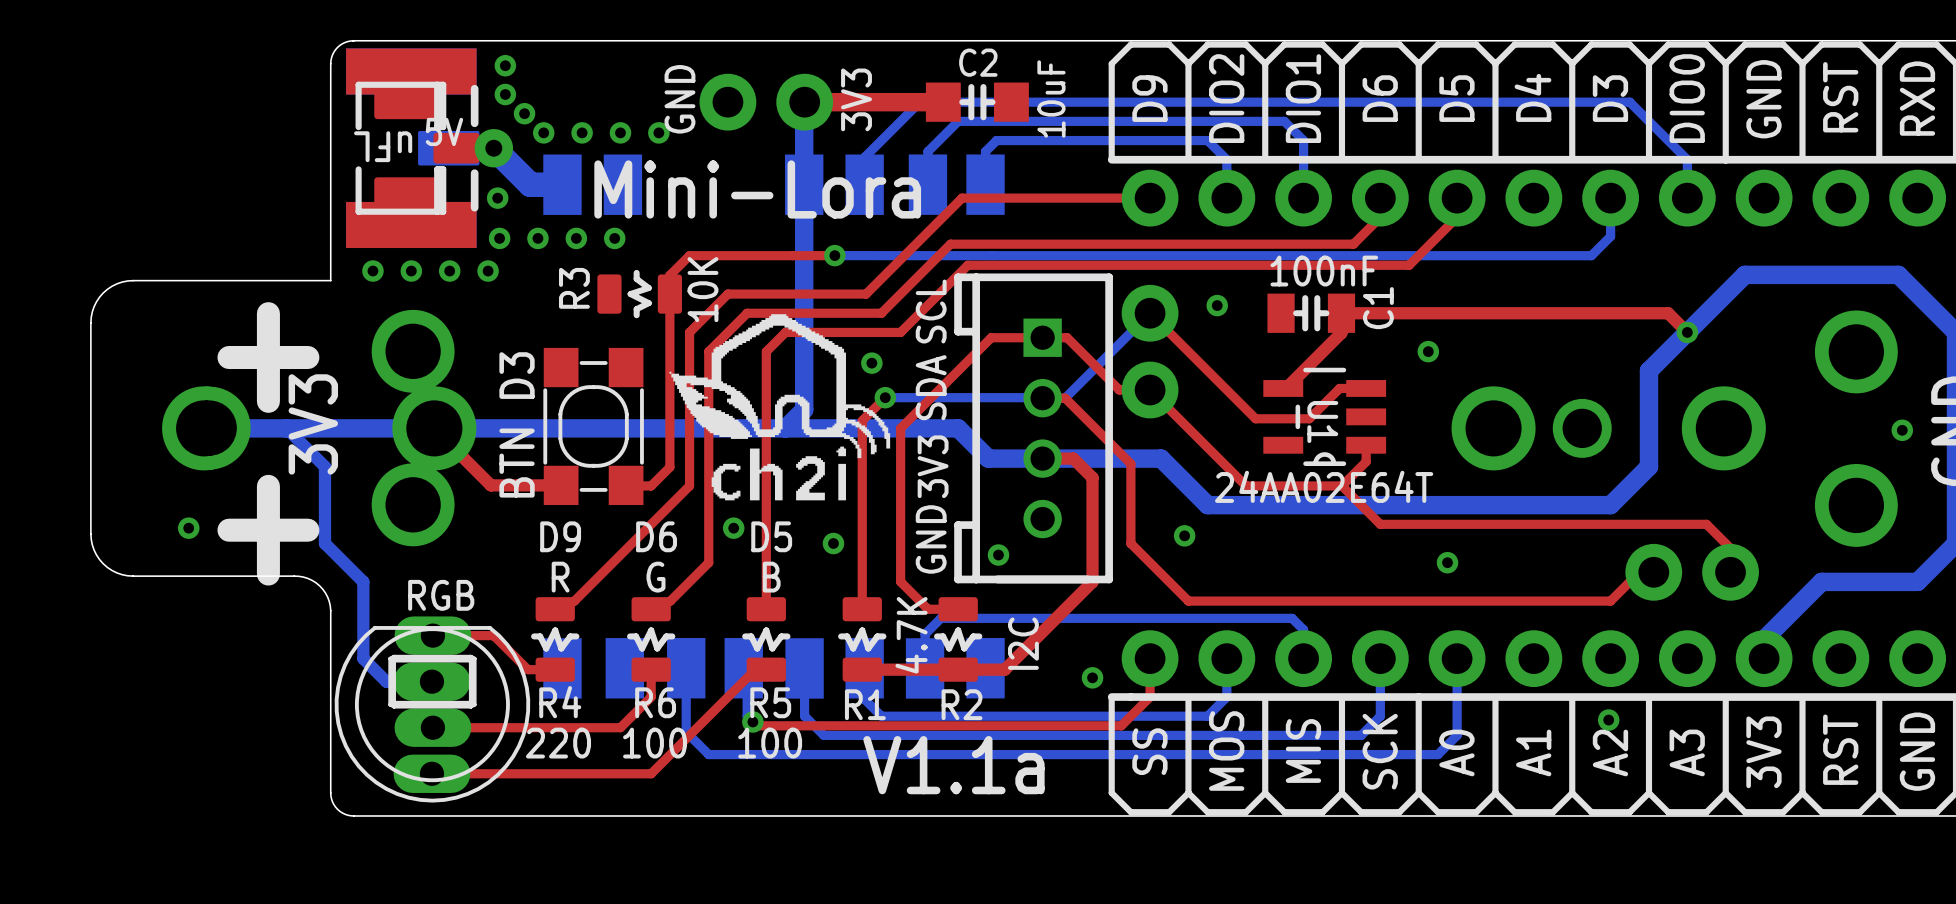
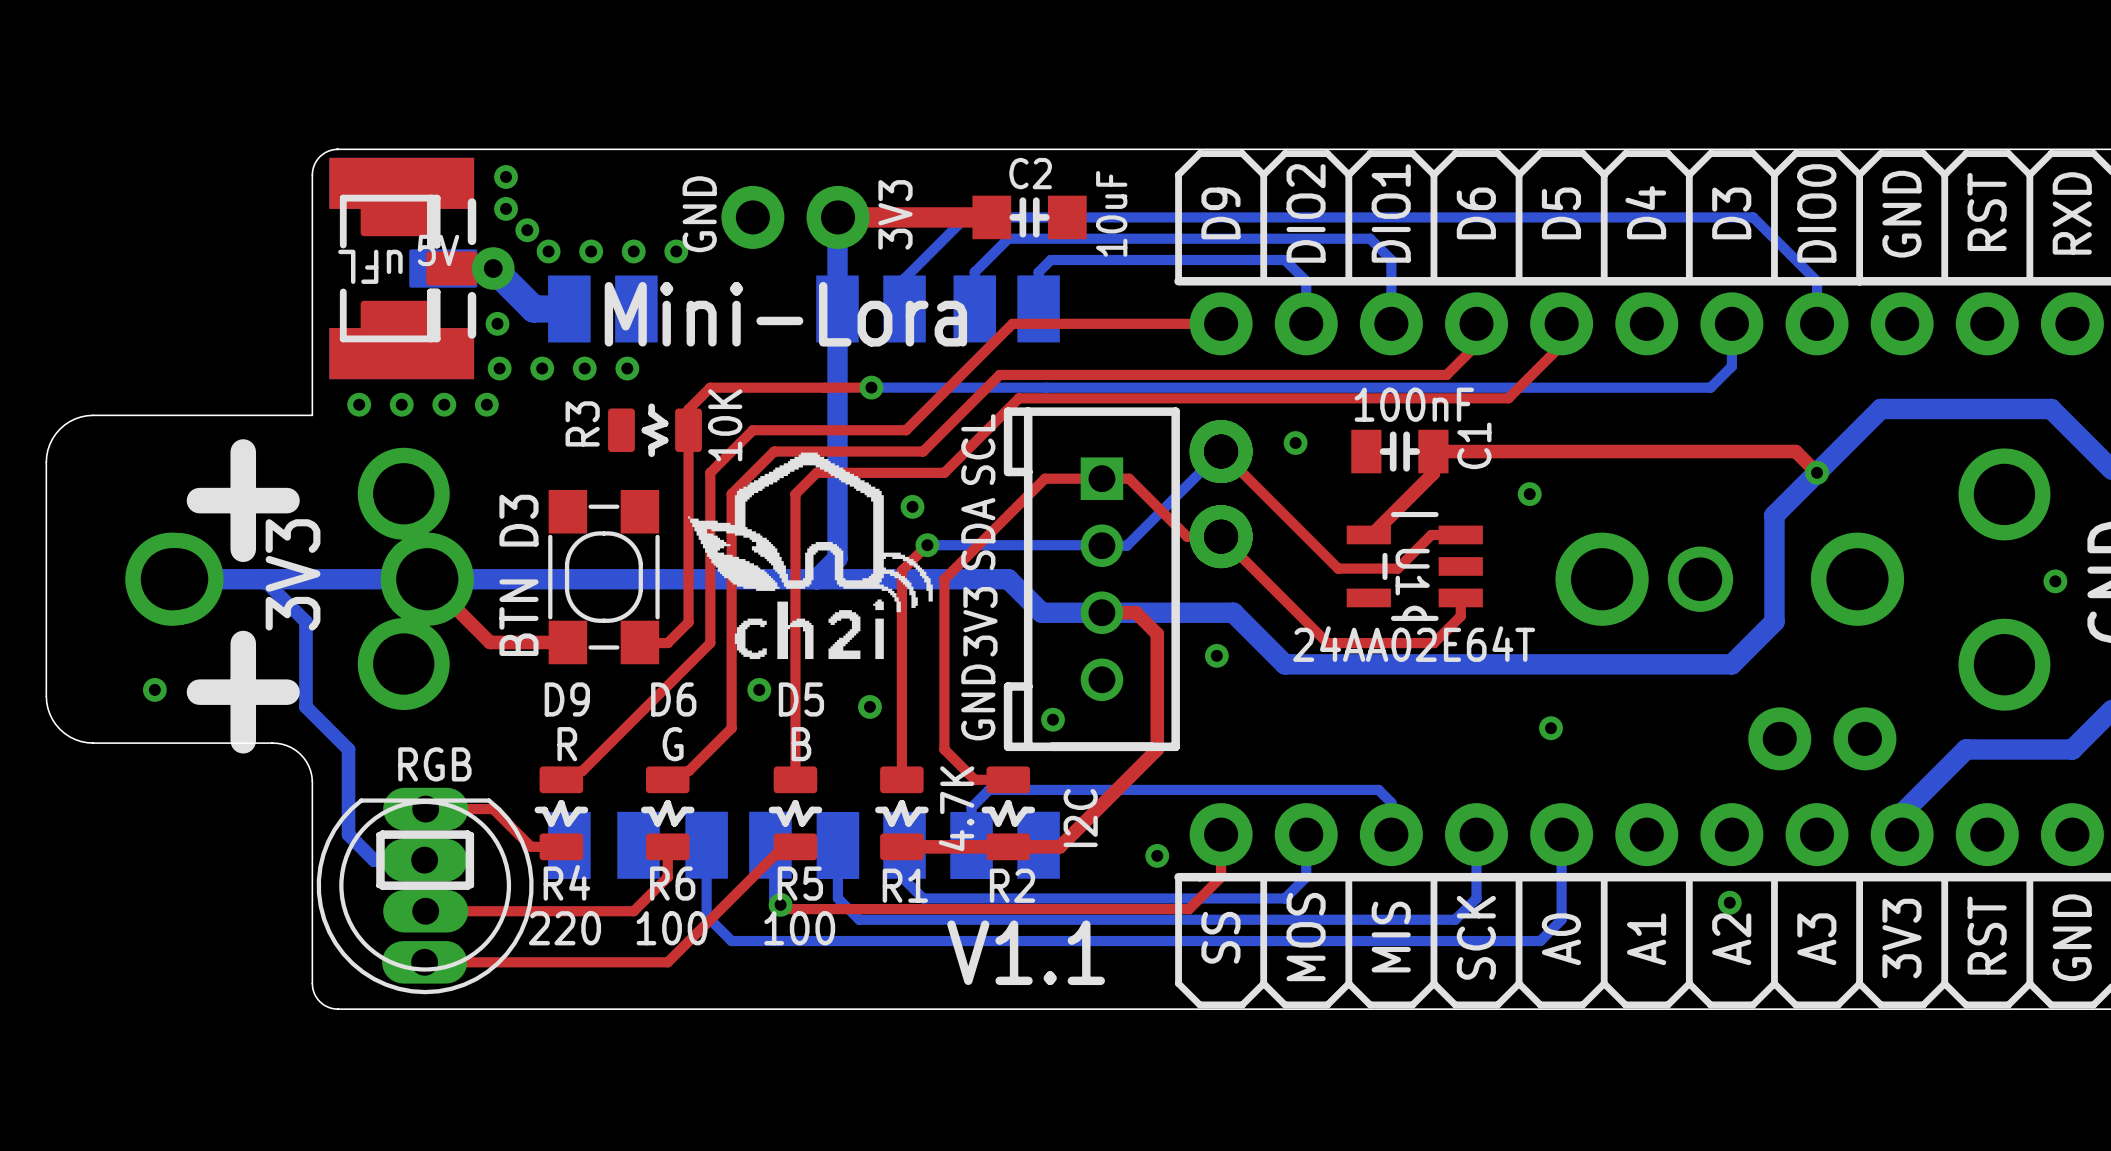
part: none -> (1221, 451)
part: none -> (1221, 536)
top track: (1042, 398) (1065, 398) (1130, 463) (1130, 543) (1188, 601) (1610, 601) (1639, 572) (1653, 572) -> none
top track: (1341, 485) (1380, 524) (1706, 524) (1730, 548) (1730, 572) -> none
via position: (1184, 535) -> (1216, 655)
text: V1.1a (953, 765) -> V1.1 (1026, 952)

